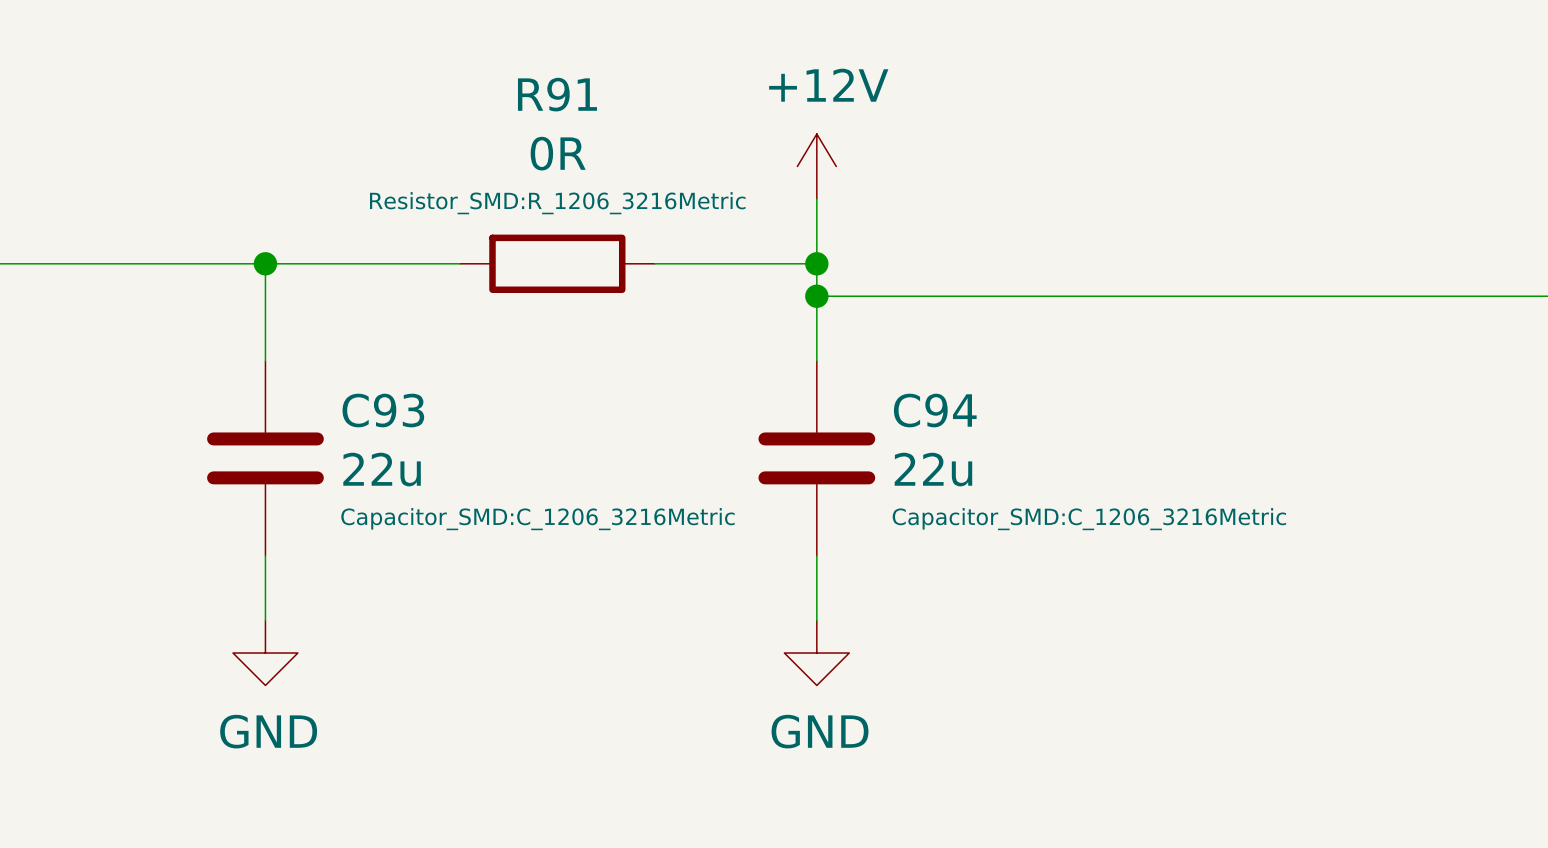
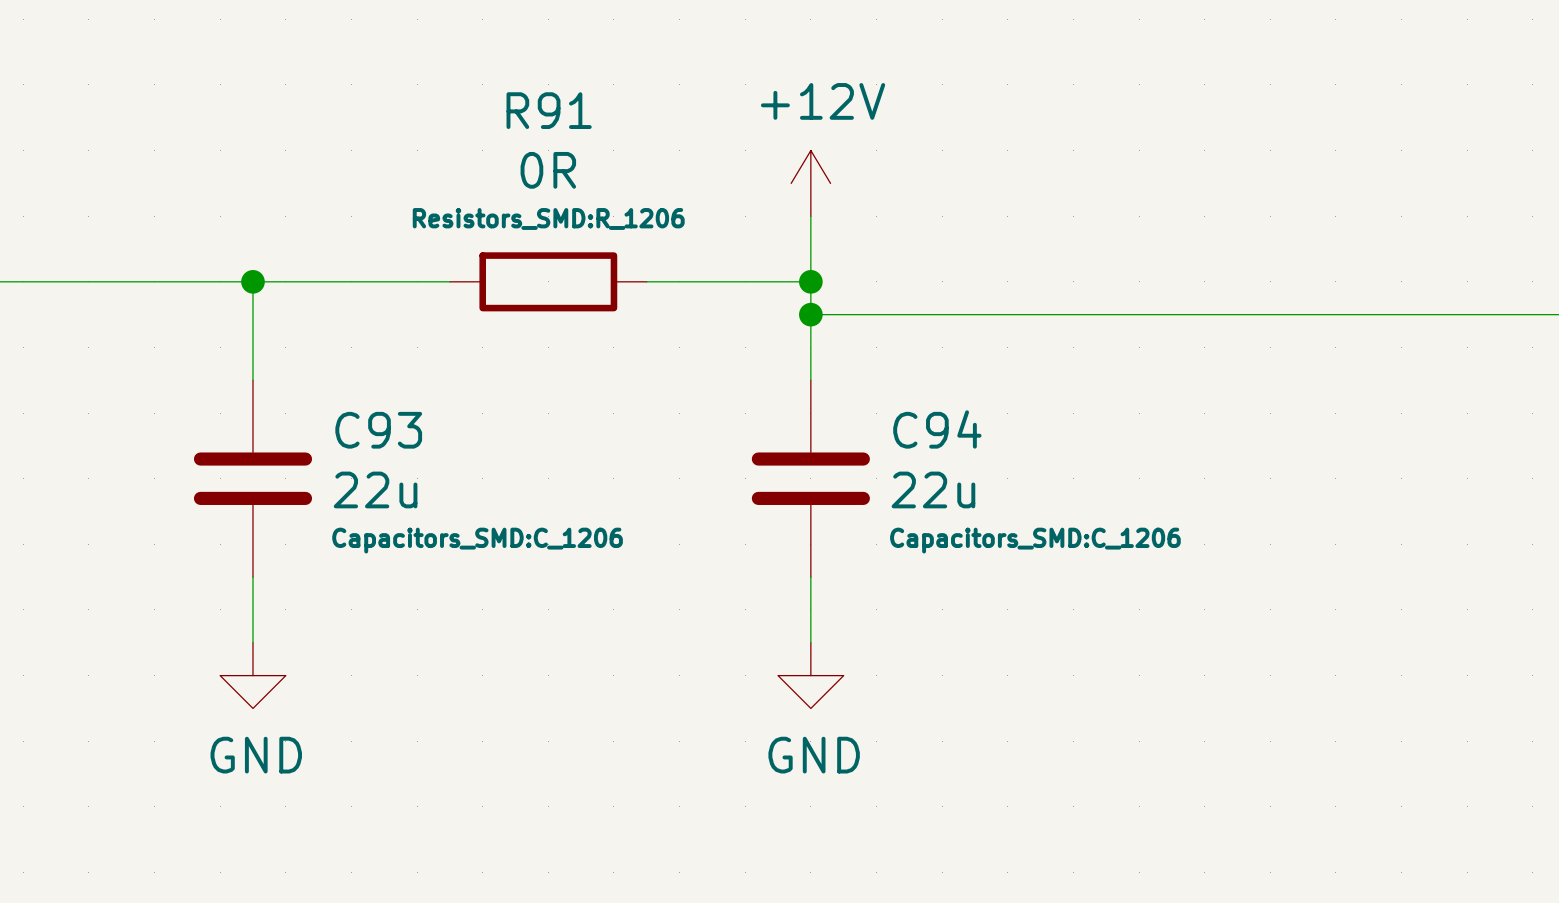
R91 text: Resistor_SMD:R_1206_3216Metric (557, 203) -> Resistors_SMD:R_1206 (548, 218)
C93 text: Capacitor_SMD:C_1206_3216Metric (537, 519) -> Capacitors_SMD:C_1206 (477, 540)
C94 text: Capacitor_SMD:C_1206_3216Metric (1089, 519) -> Capacitors_SMD:C_1206 (1035, 540)

